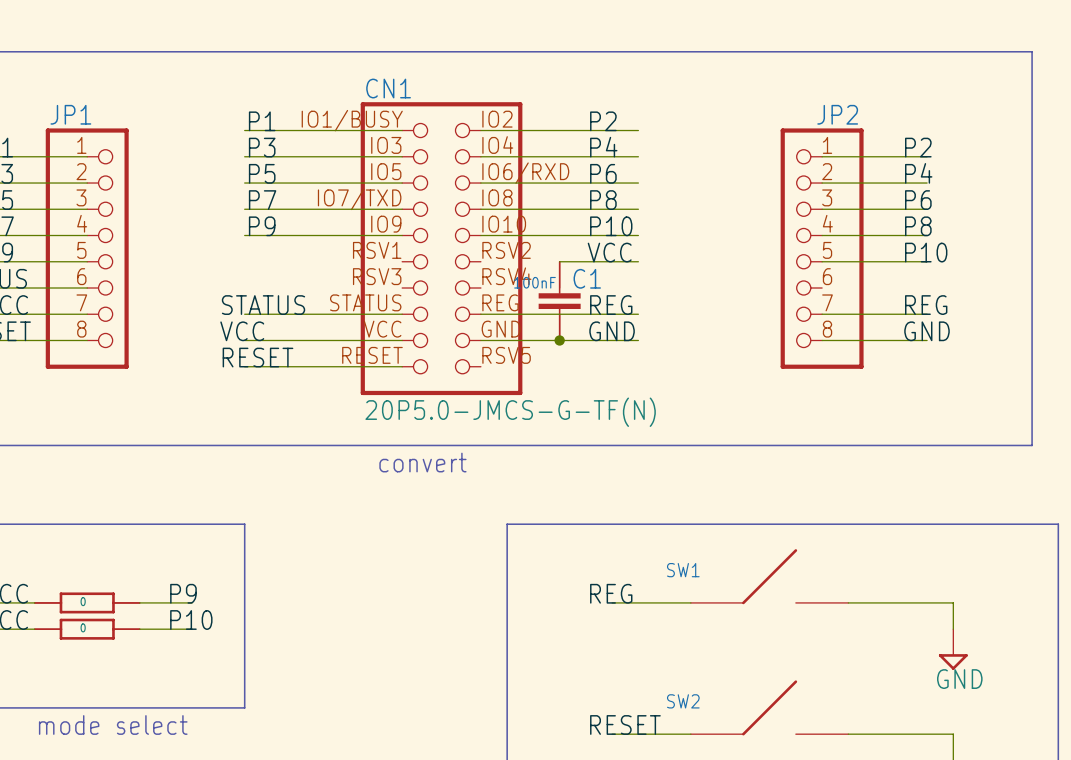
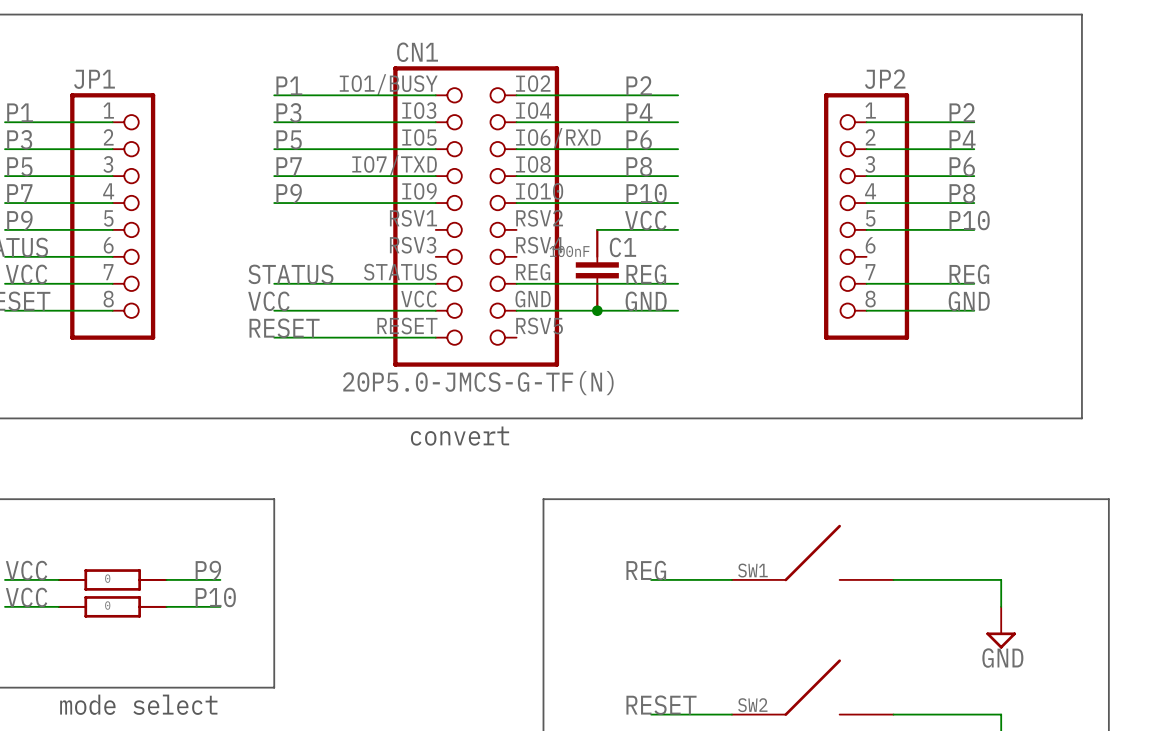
CN1 value position: 20P5.0-JMCS-G-TF(N) (510, 412) -> 20P5.0-JMCS-G-TF(N) (478, 383)
SW1 name position: SW1 (683, 570) -> SW1 (752, 570)
SW2 name position: SW2 (683, 701) -> SW2 (752, 705)

